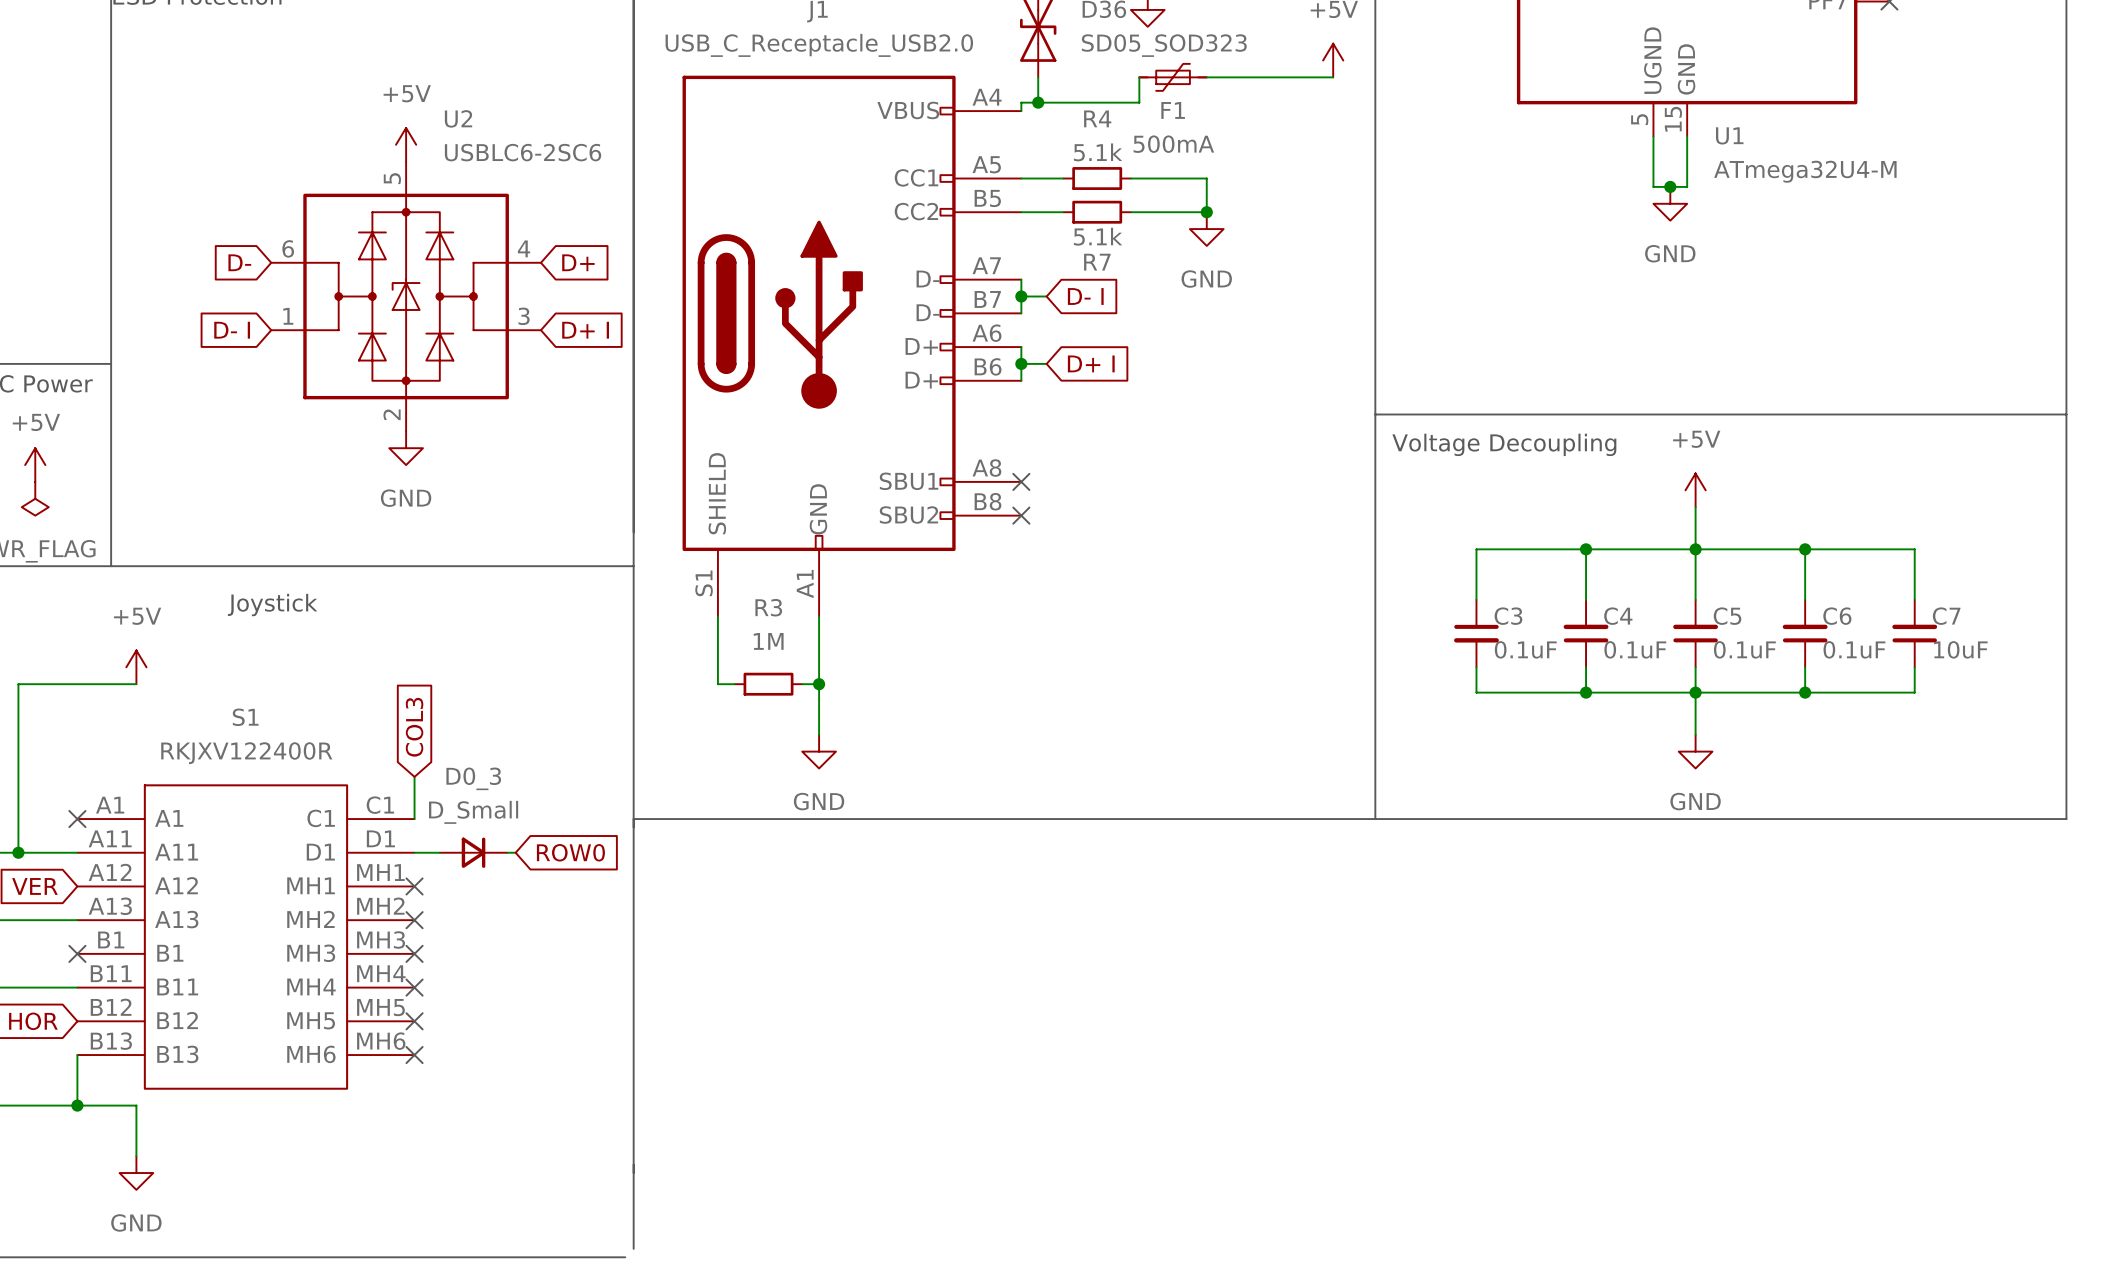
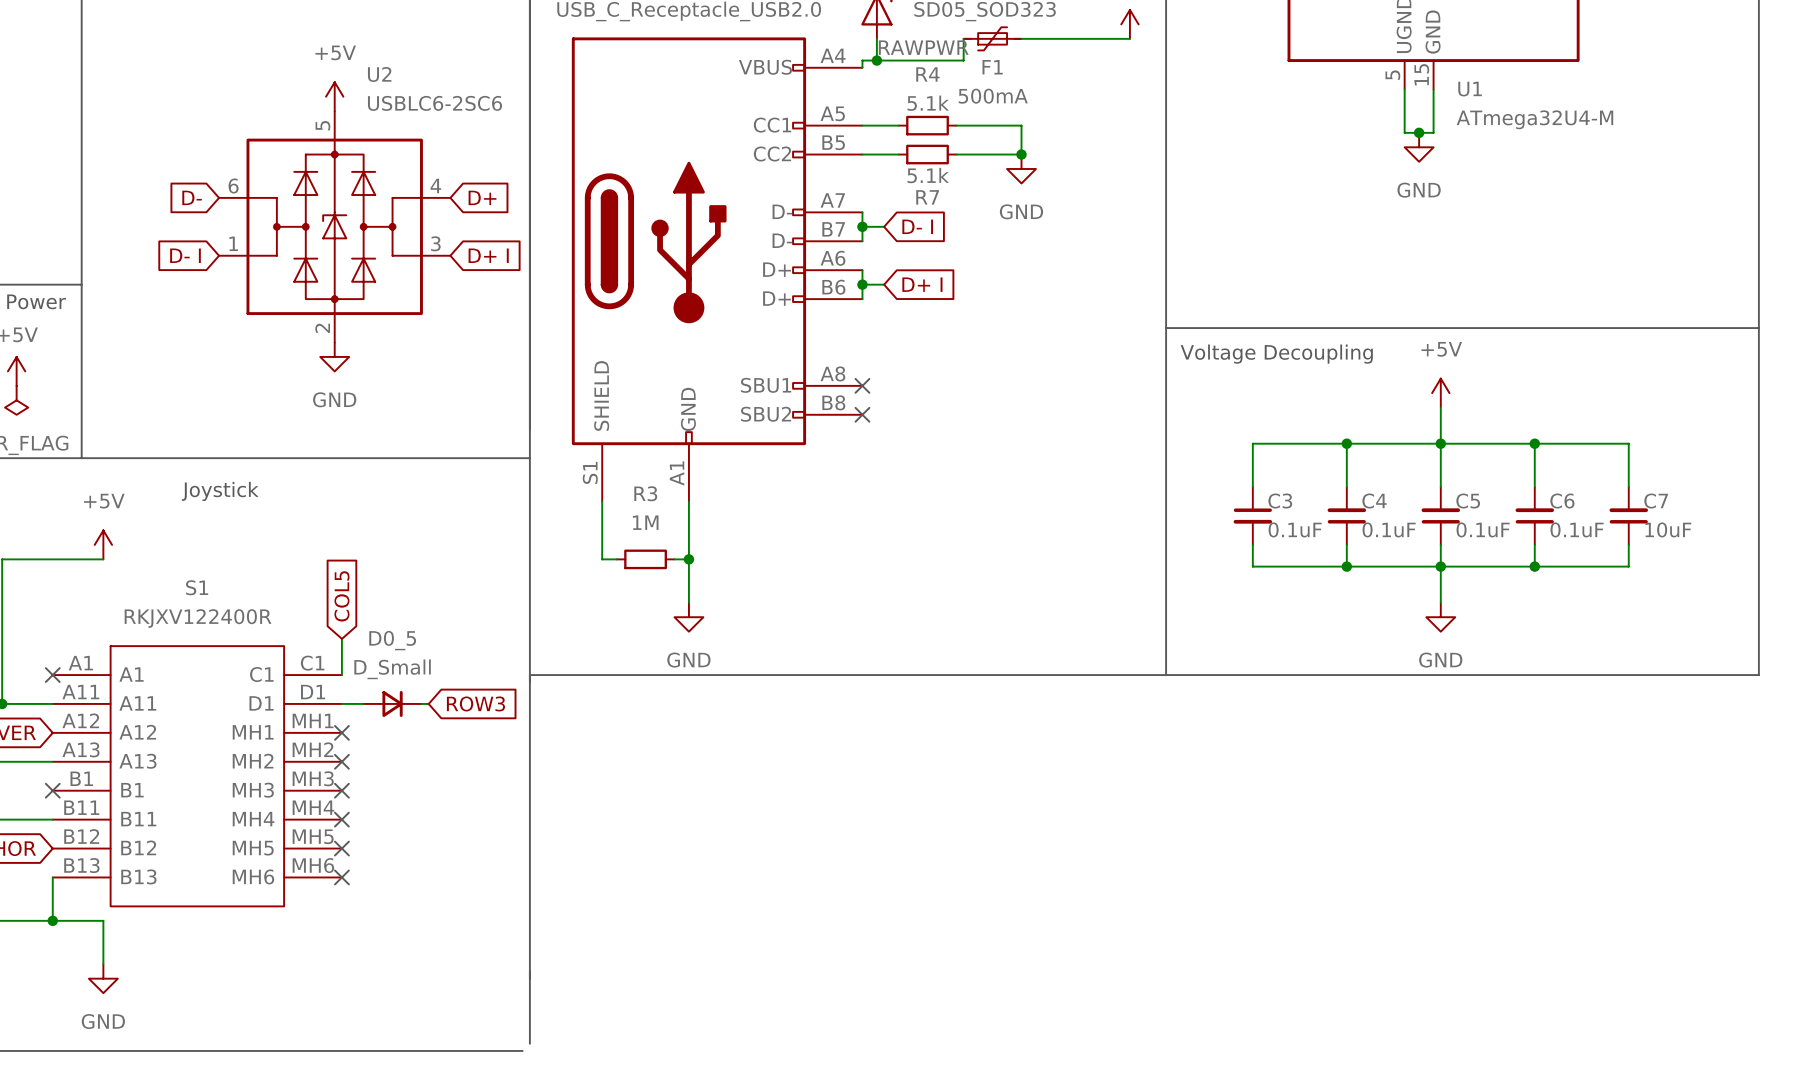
label: none -> RAWPWR (923, 47)
global label: COL3 (414, 727) -> COL5 (341, 596)
D0_3 name: D0_3 (473, 778) -> D0_5 (392, 640)
global label: ROW0 (570, 852) -> ROW3 (475, 703)

